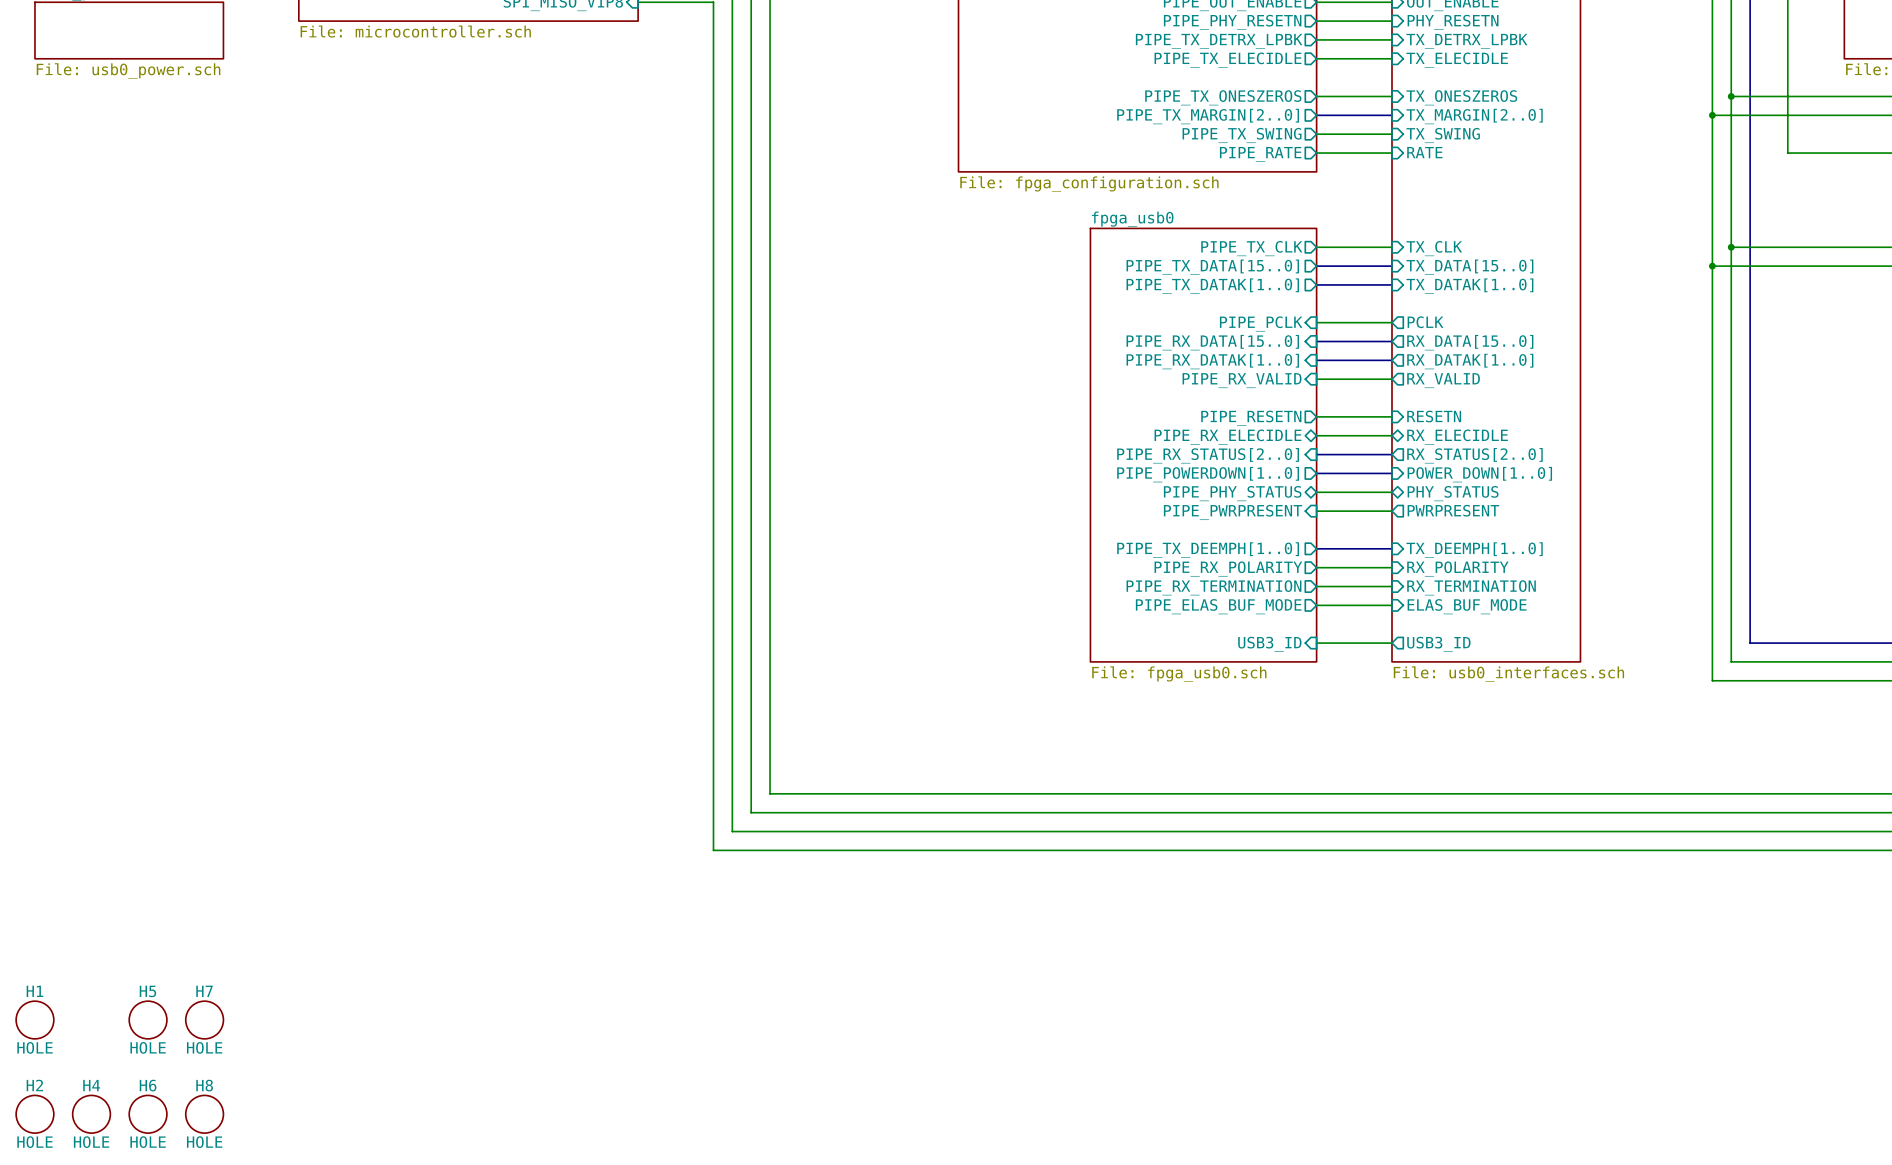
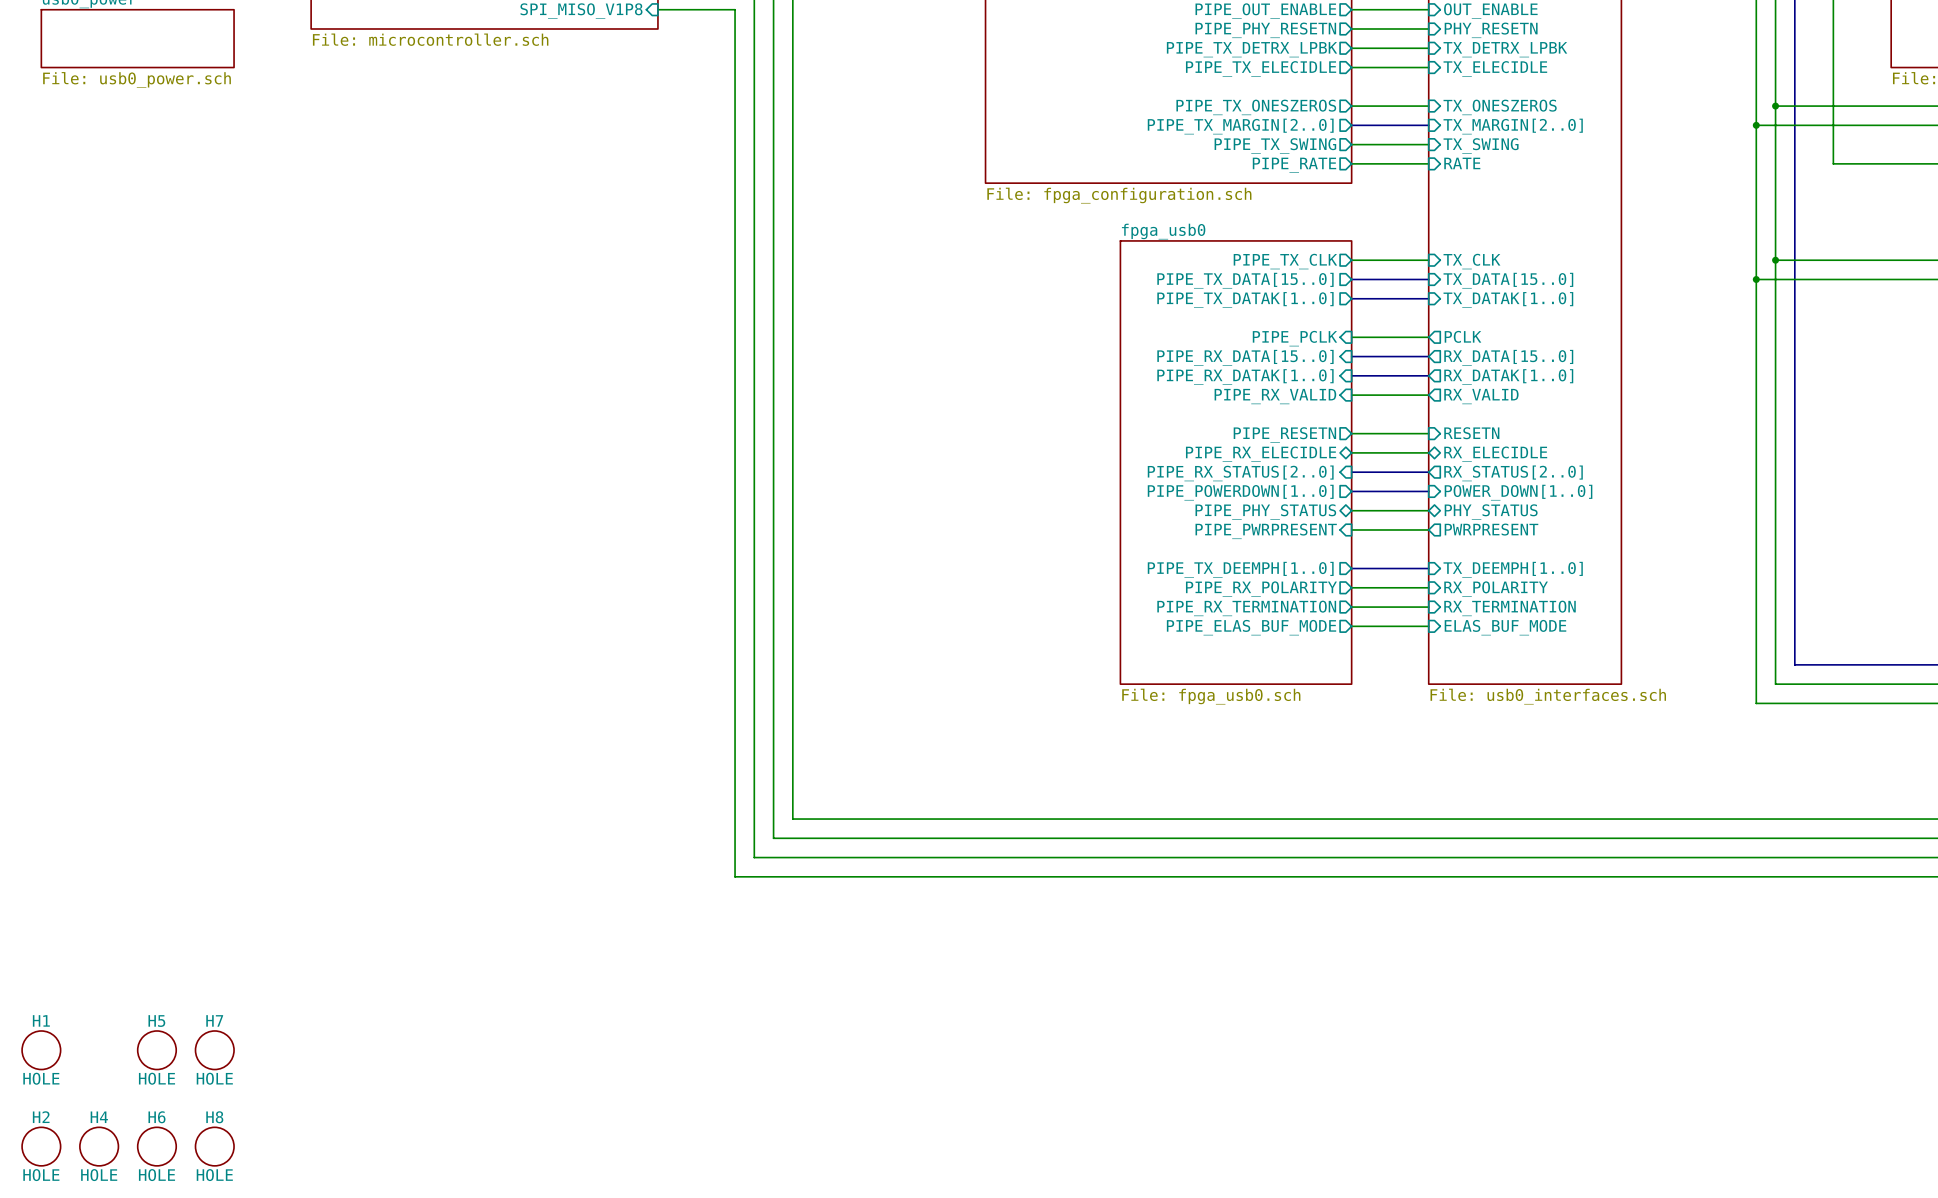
wire: (1316, 643) (1392, 643) -> none
sheet pin: USB3_ID (1269, 644) -> none
sheet pin: USB3_ID (1438, 644) -> none

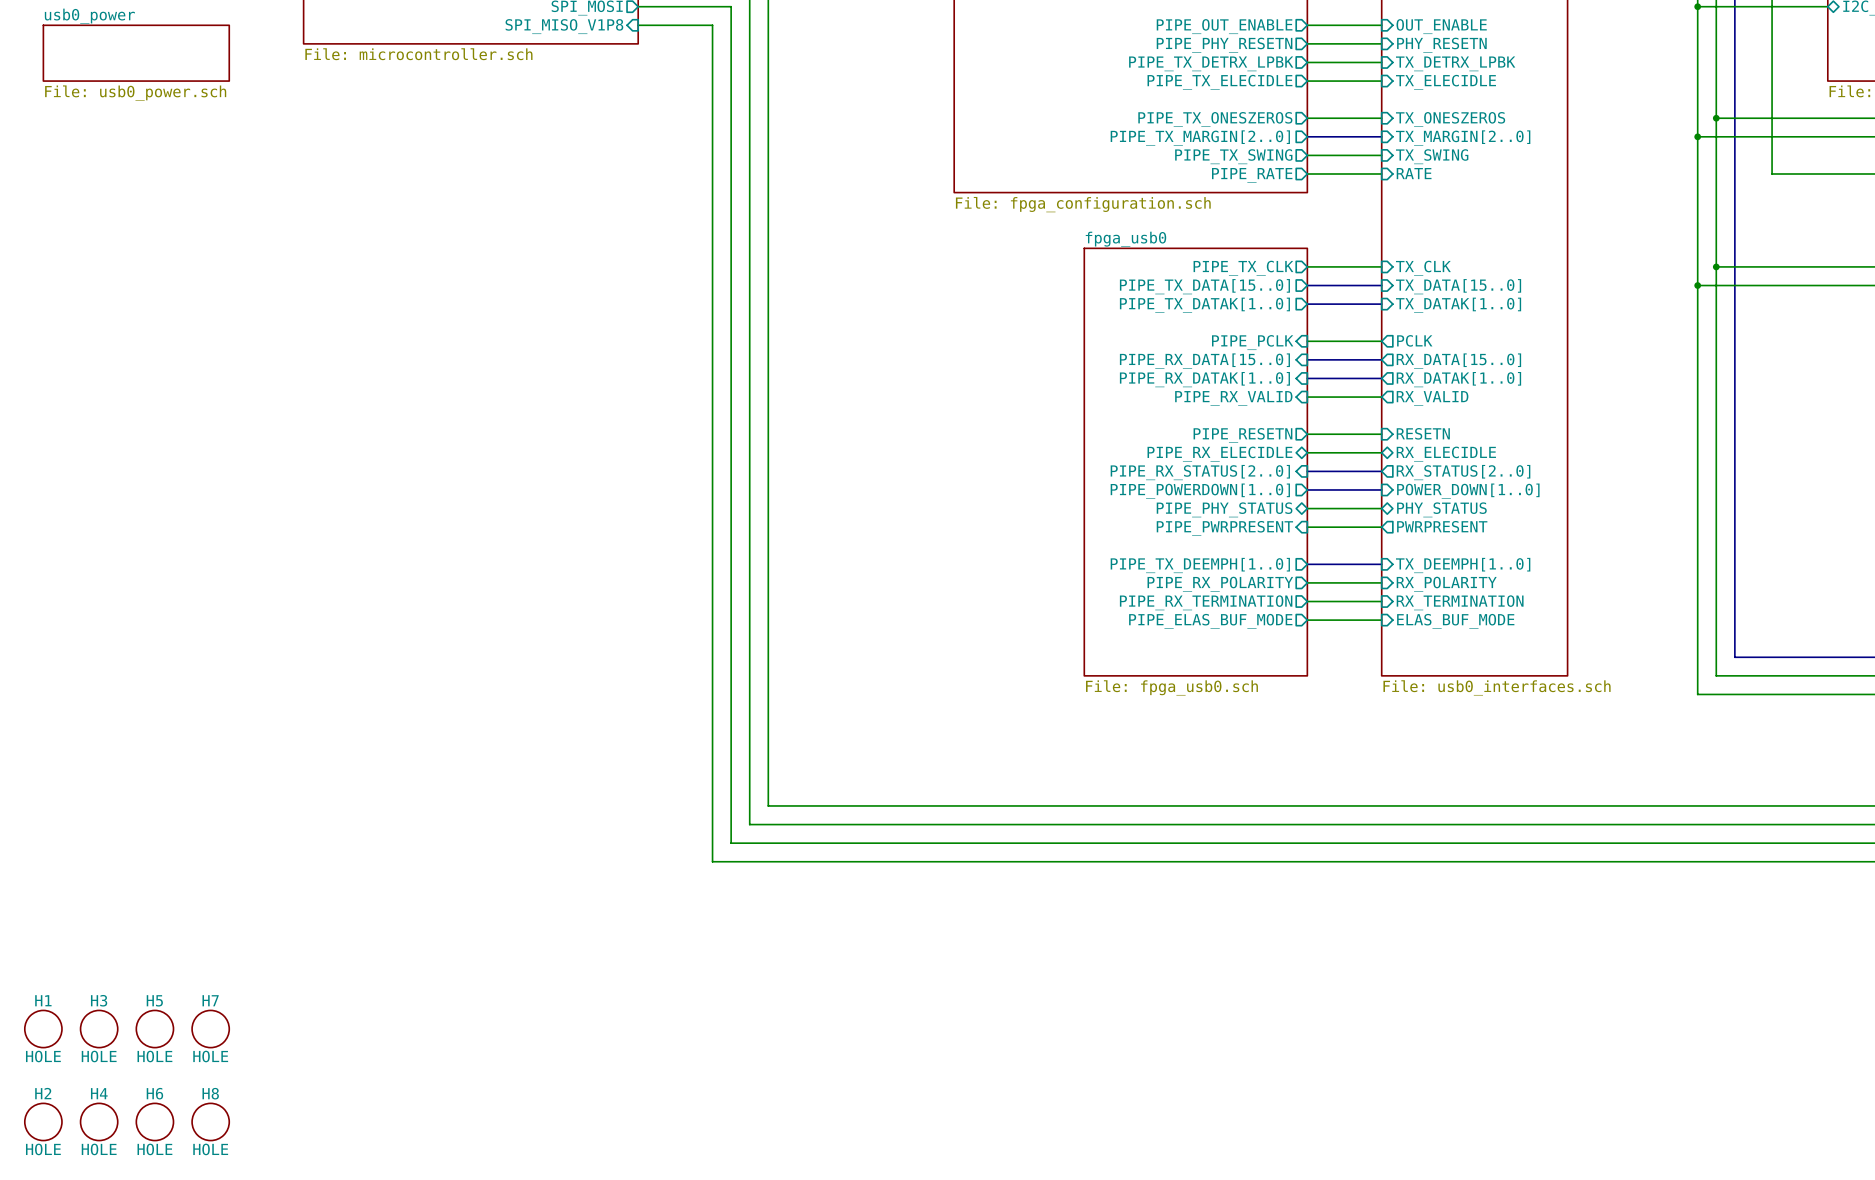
H3: none -> HOLE (99, 1029)

